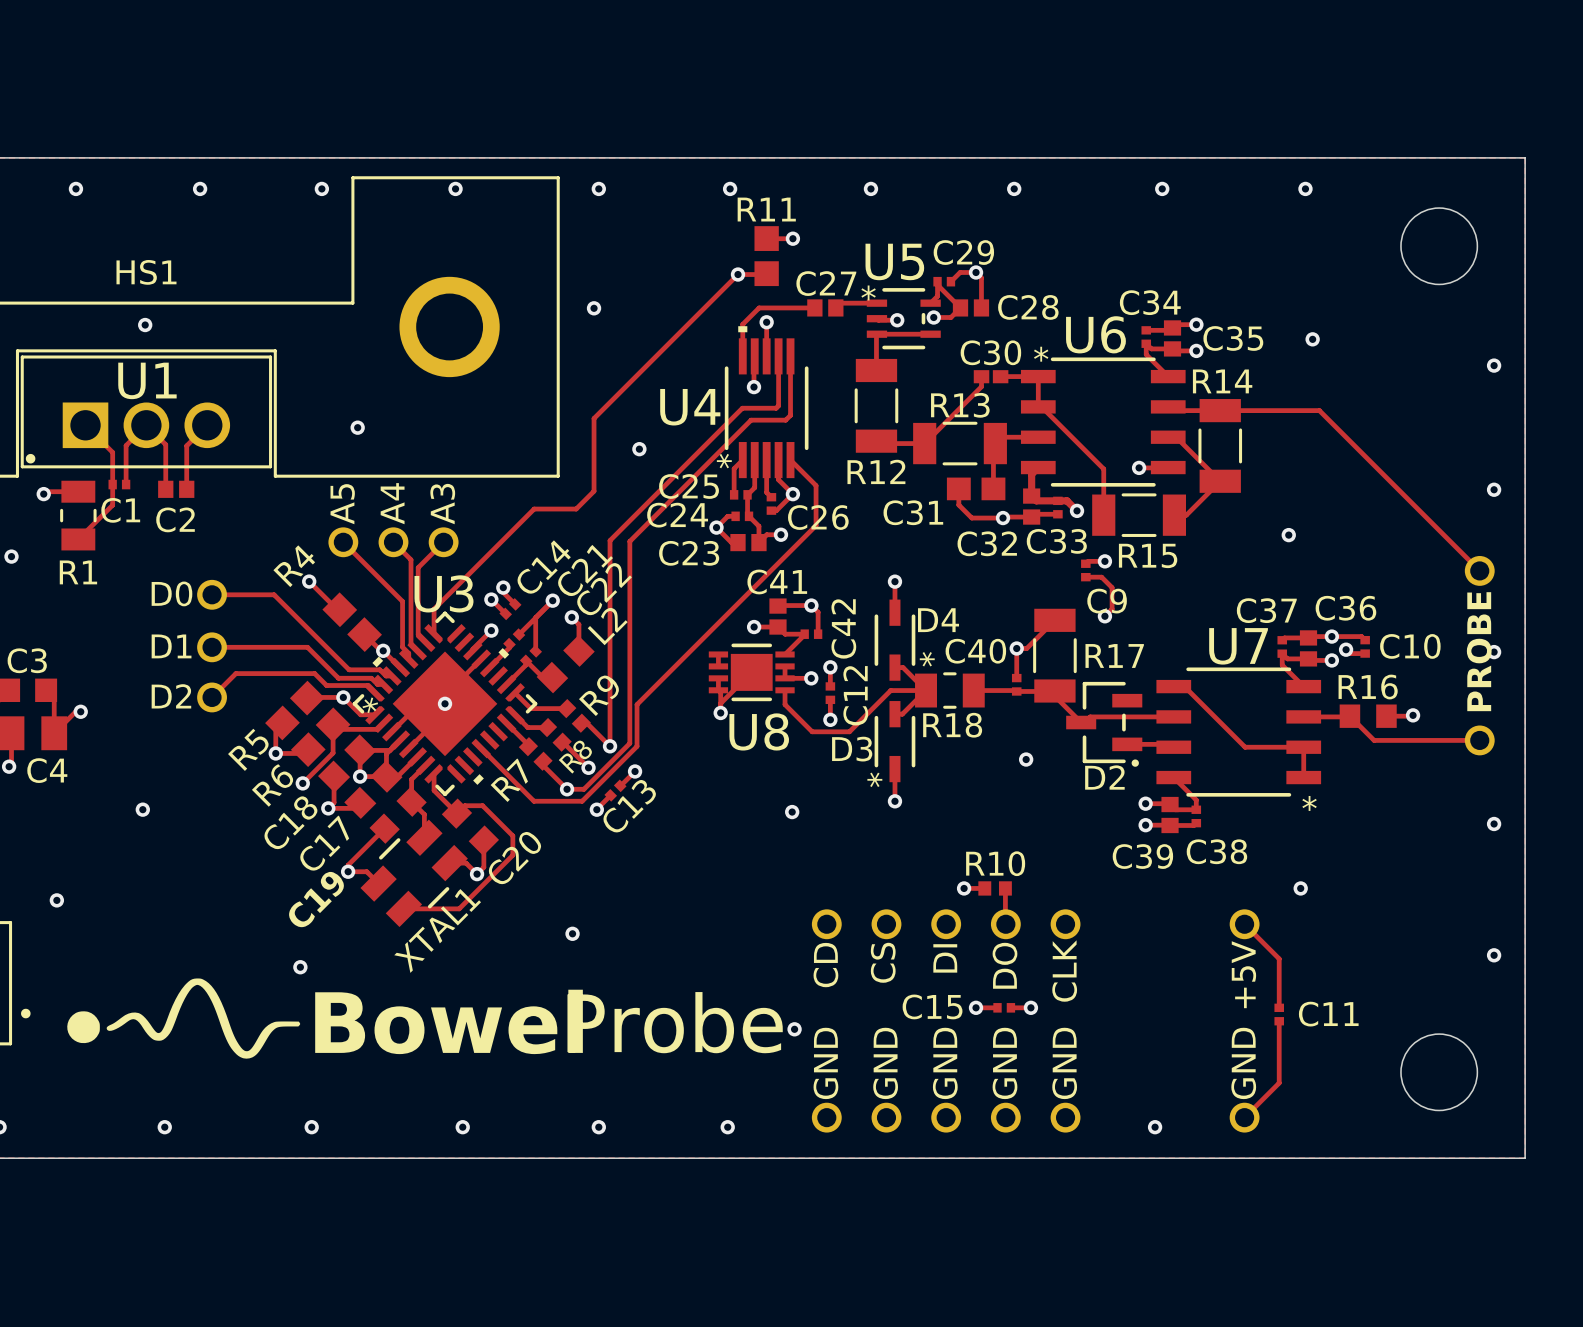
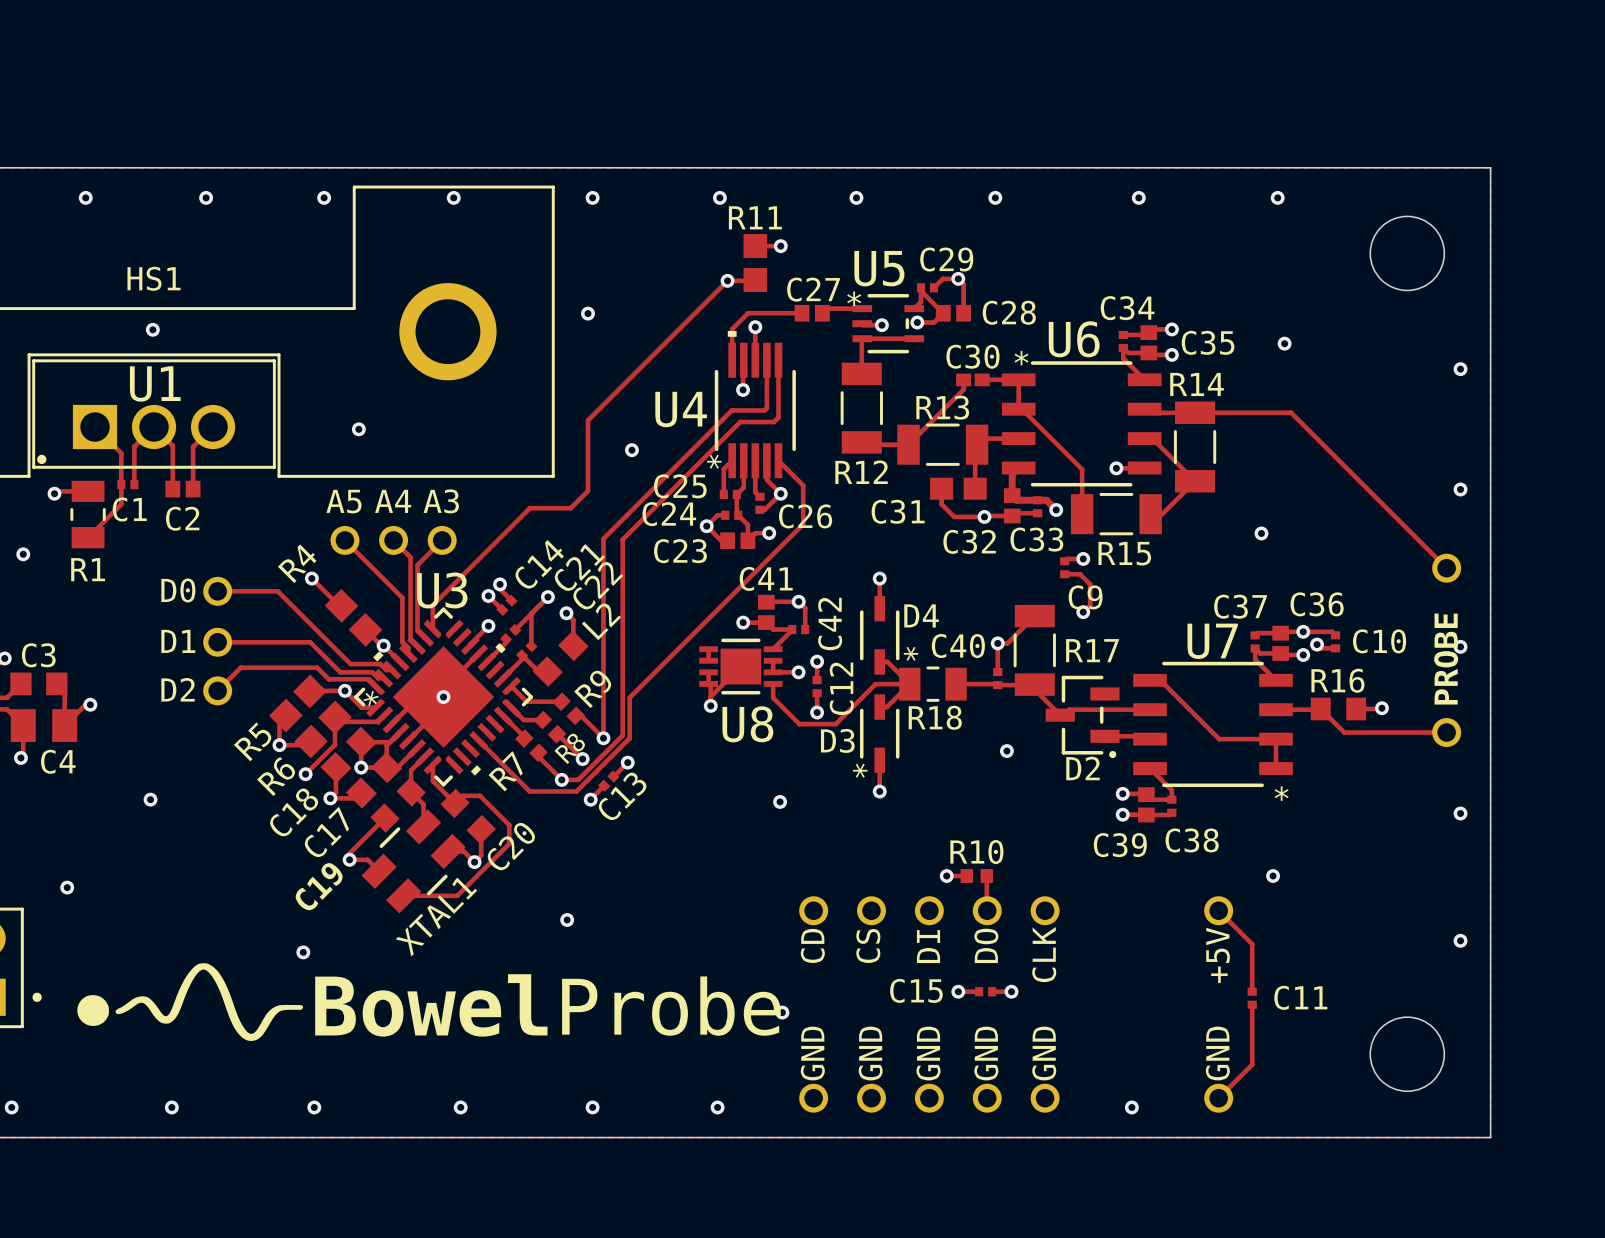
A4 name rotation: 0° (392, 503) -> 90° clockwise (393, 501)
A5 name rotation: 0° (342, 504) -> 90° clockwise (343, 501)
A3 name rotation: 0° (442, 504) -> 90° clockwise (441, 501)

